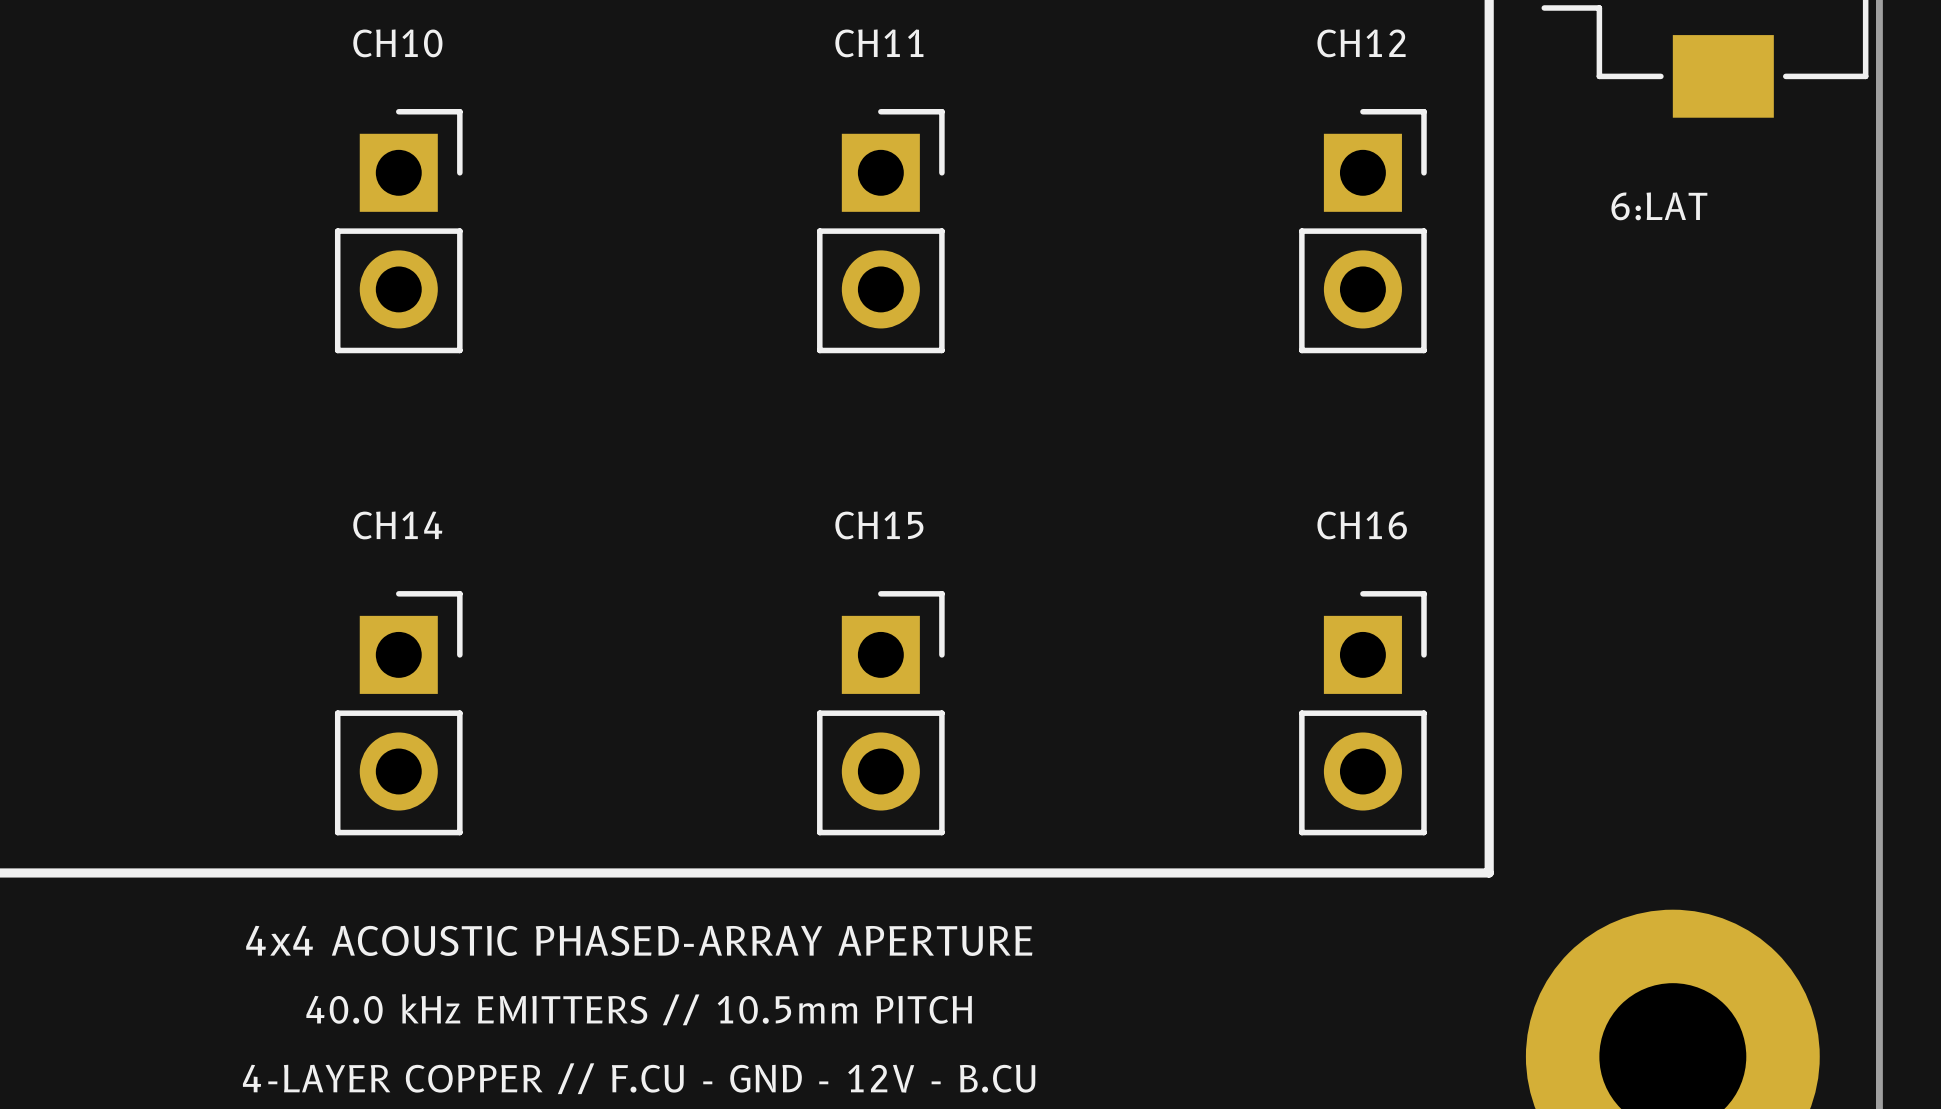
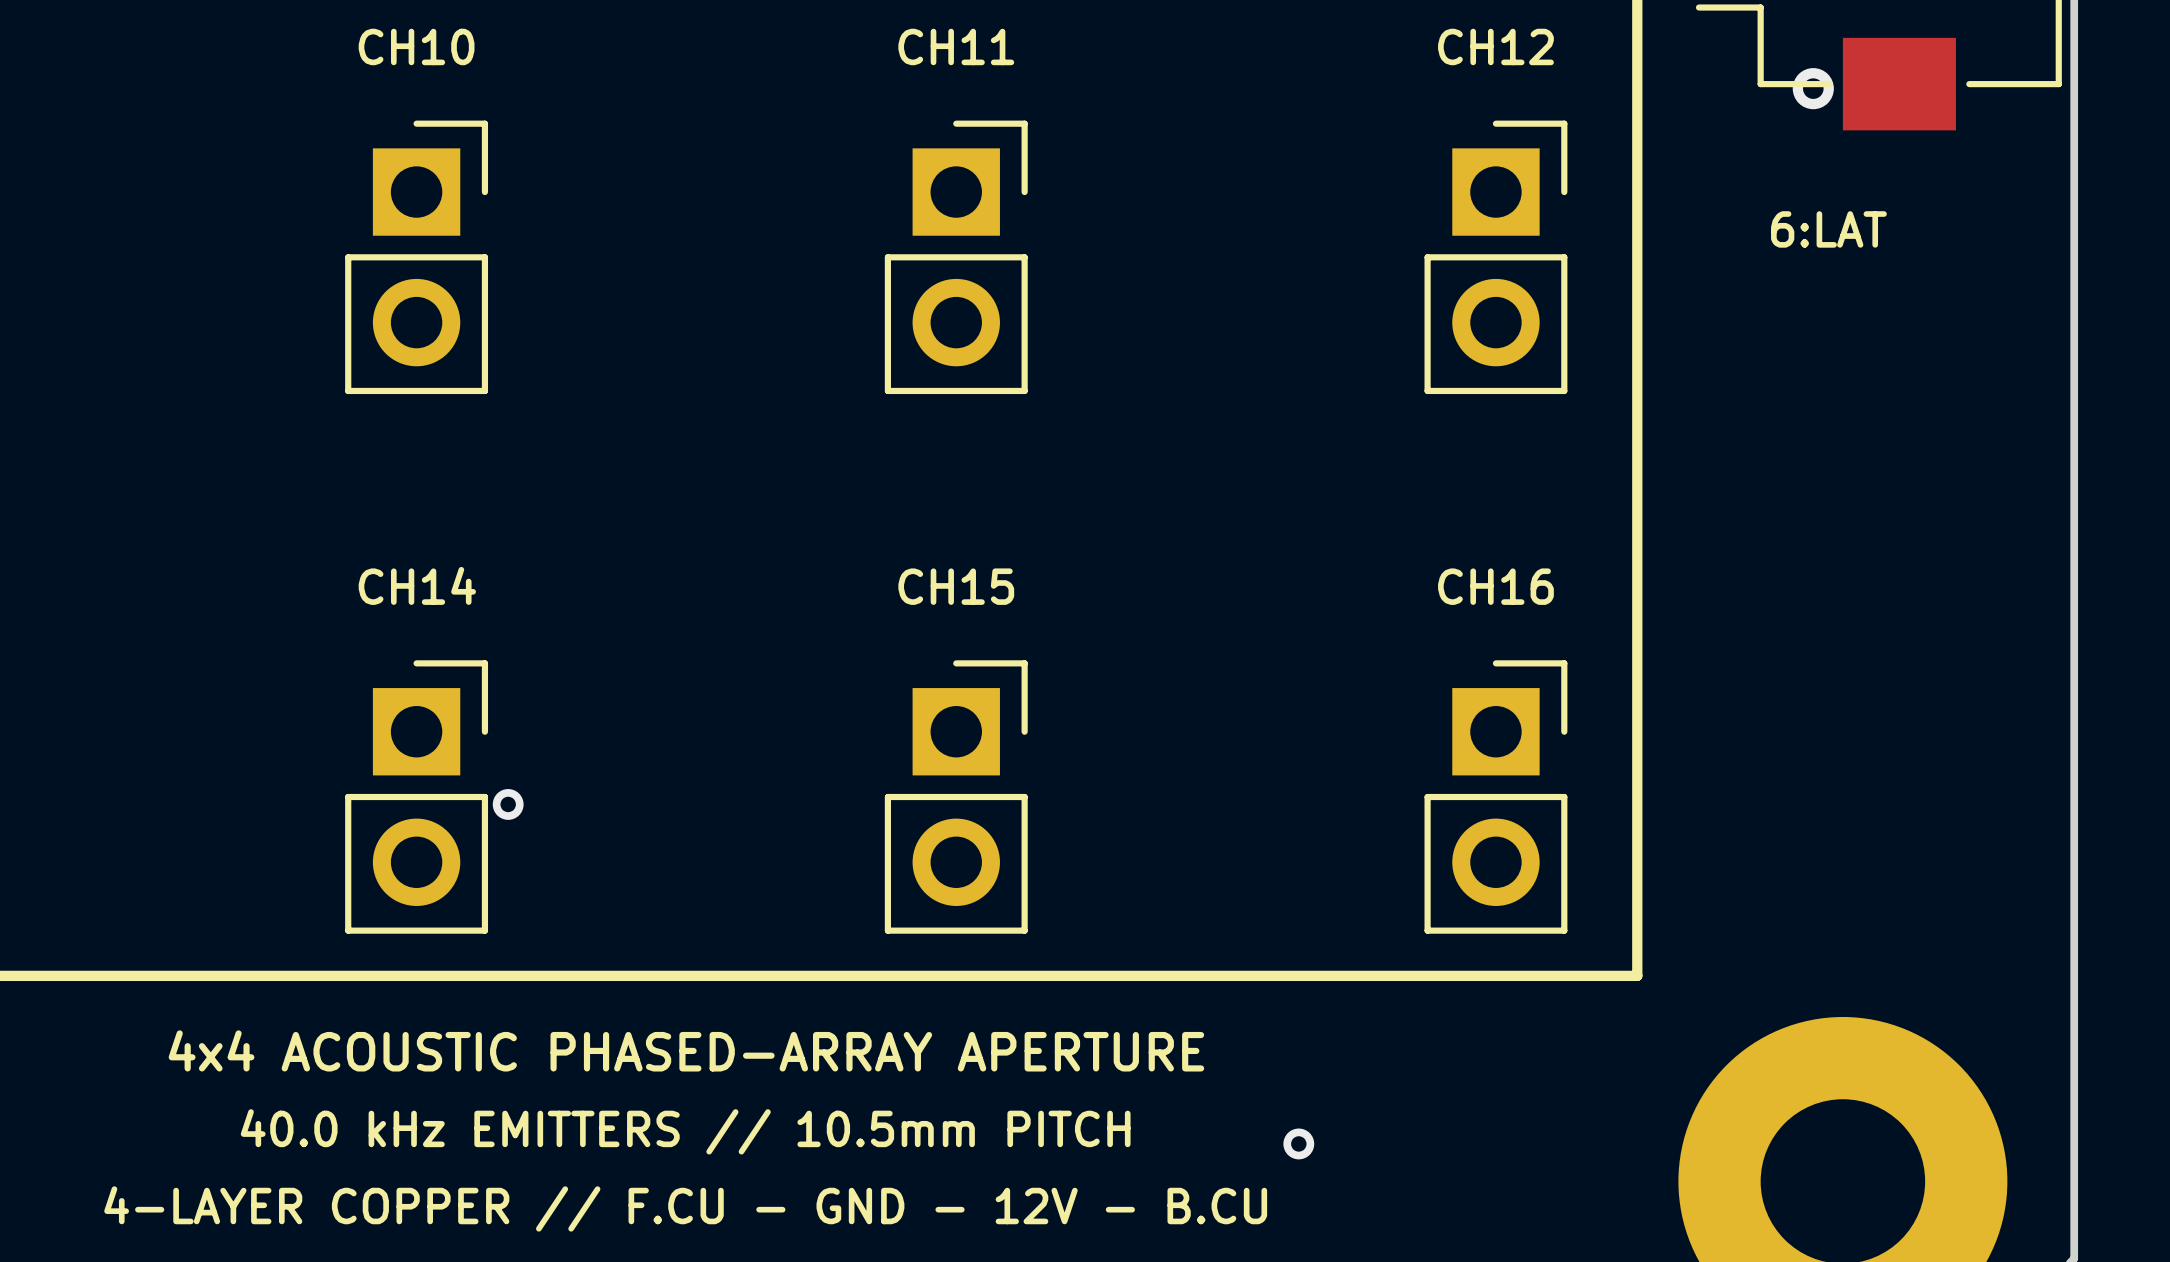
via: none -> (1813, 88)
via: none -> (508, 804)
via: none -> (1298, 1143)

